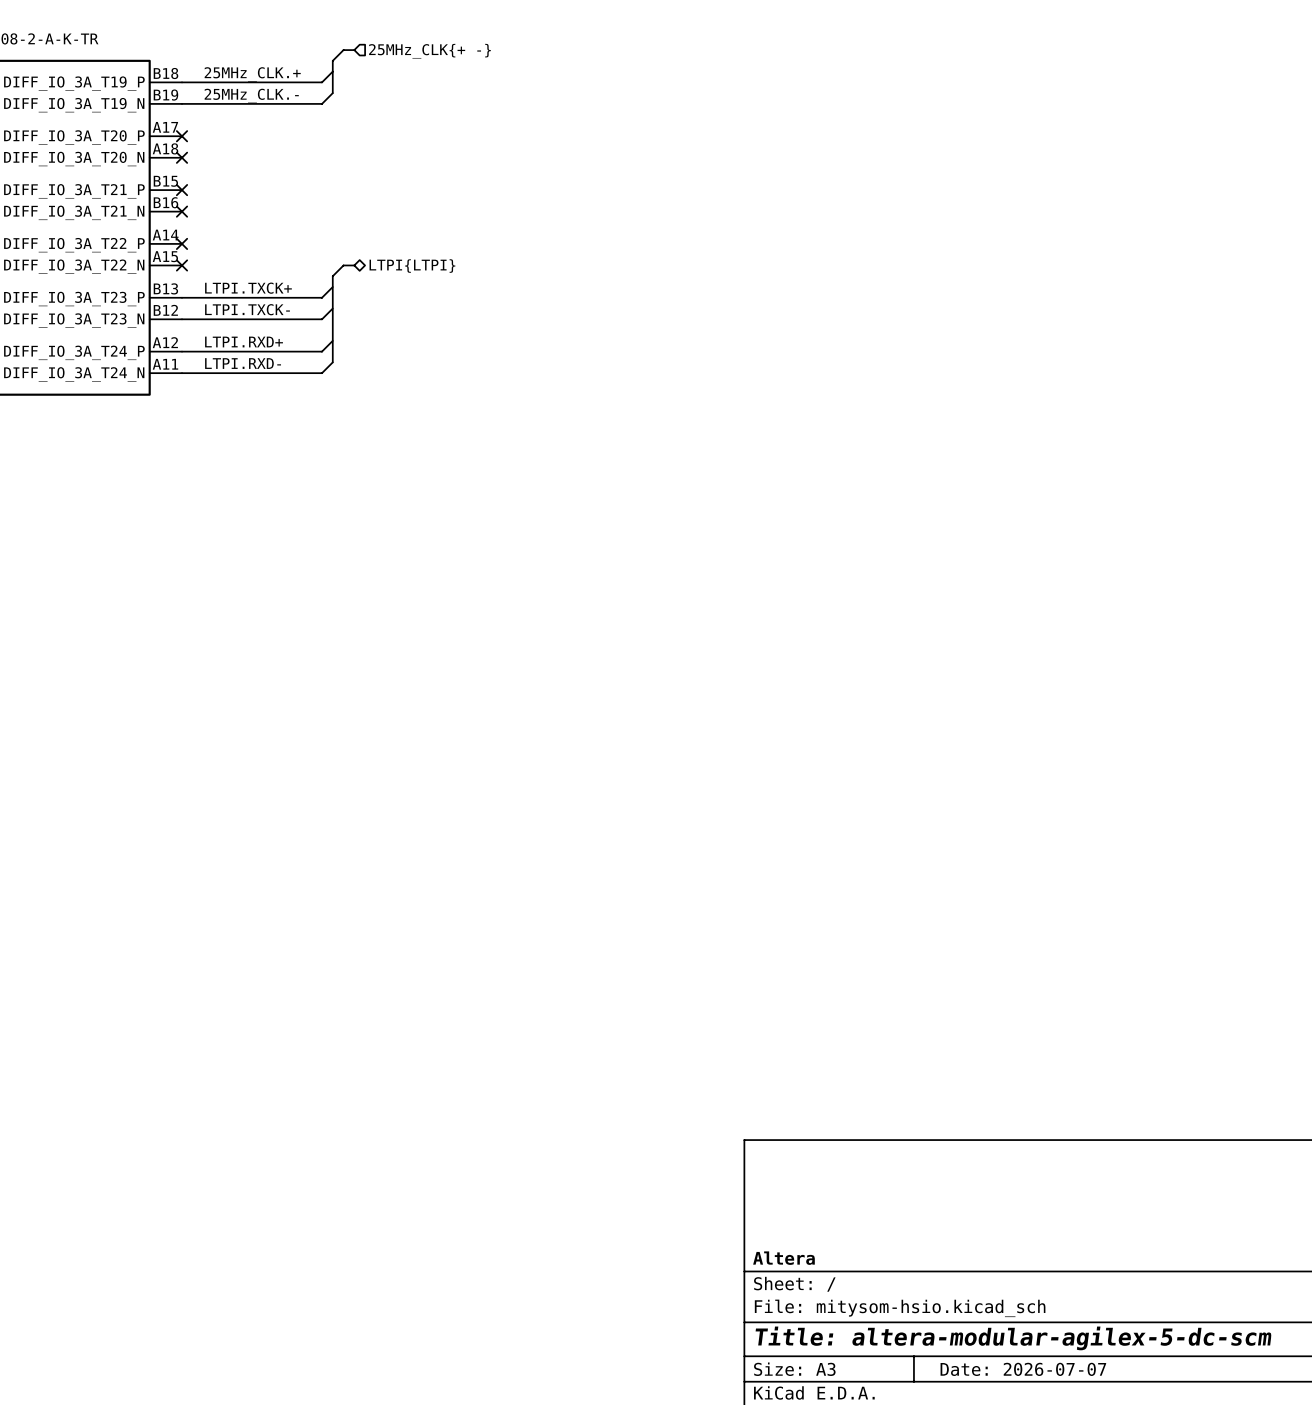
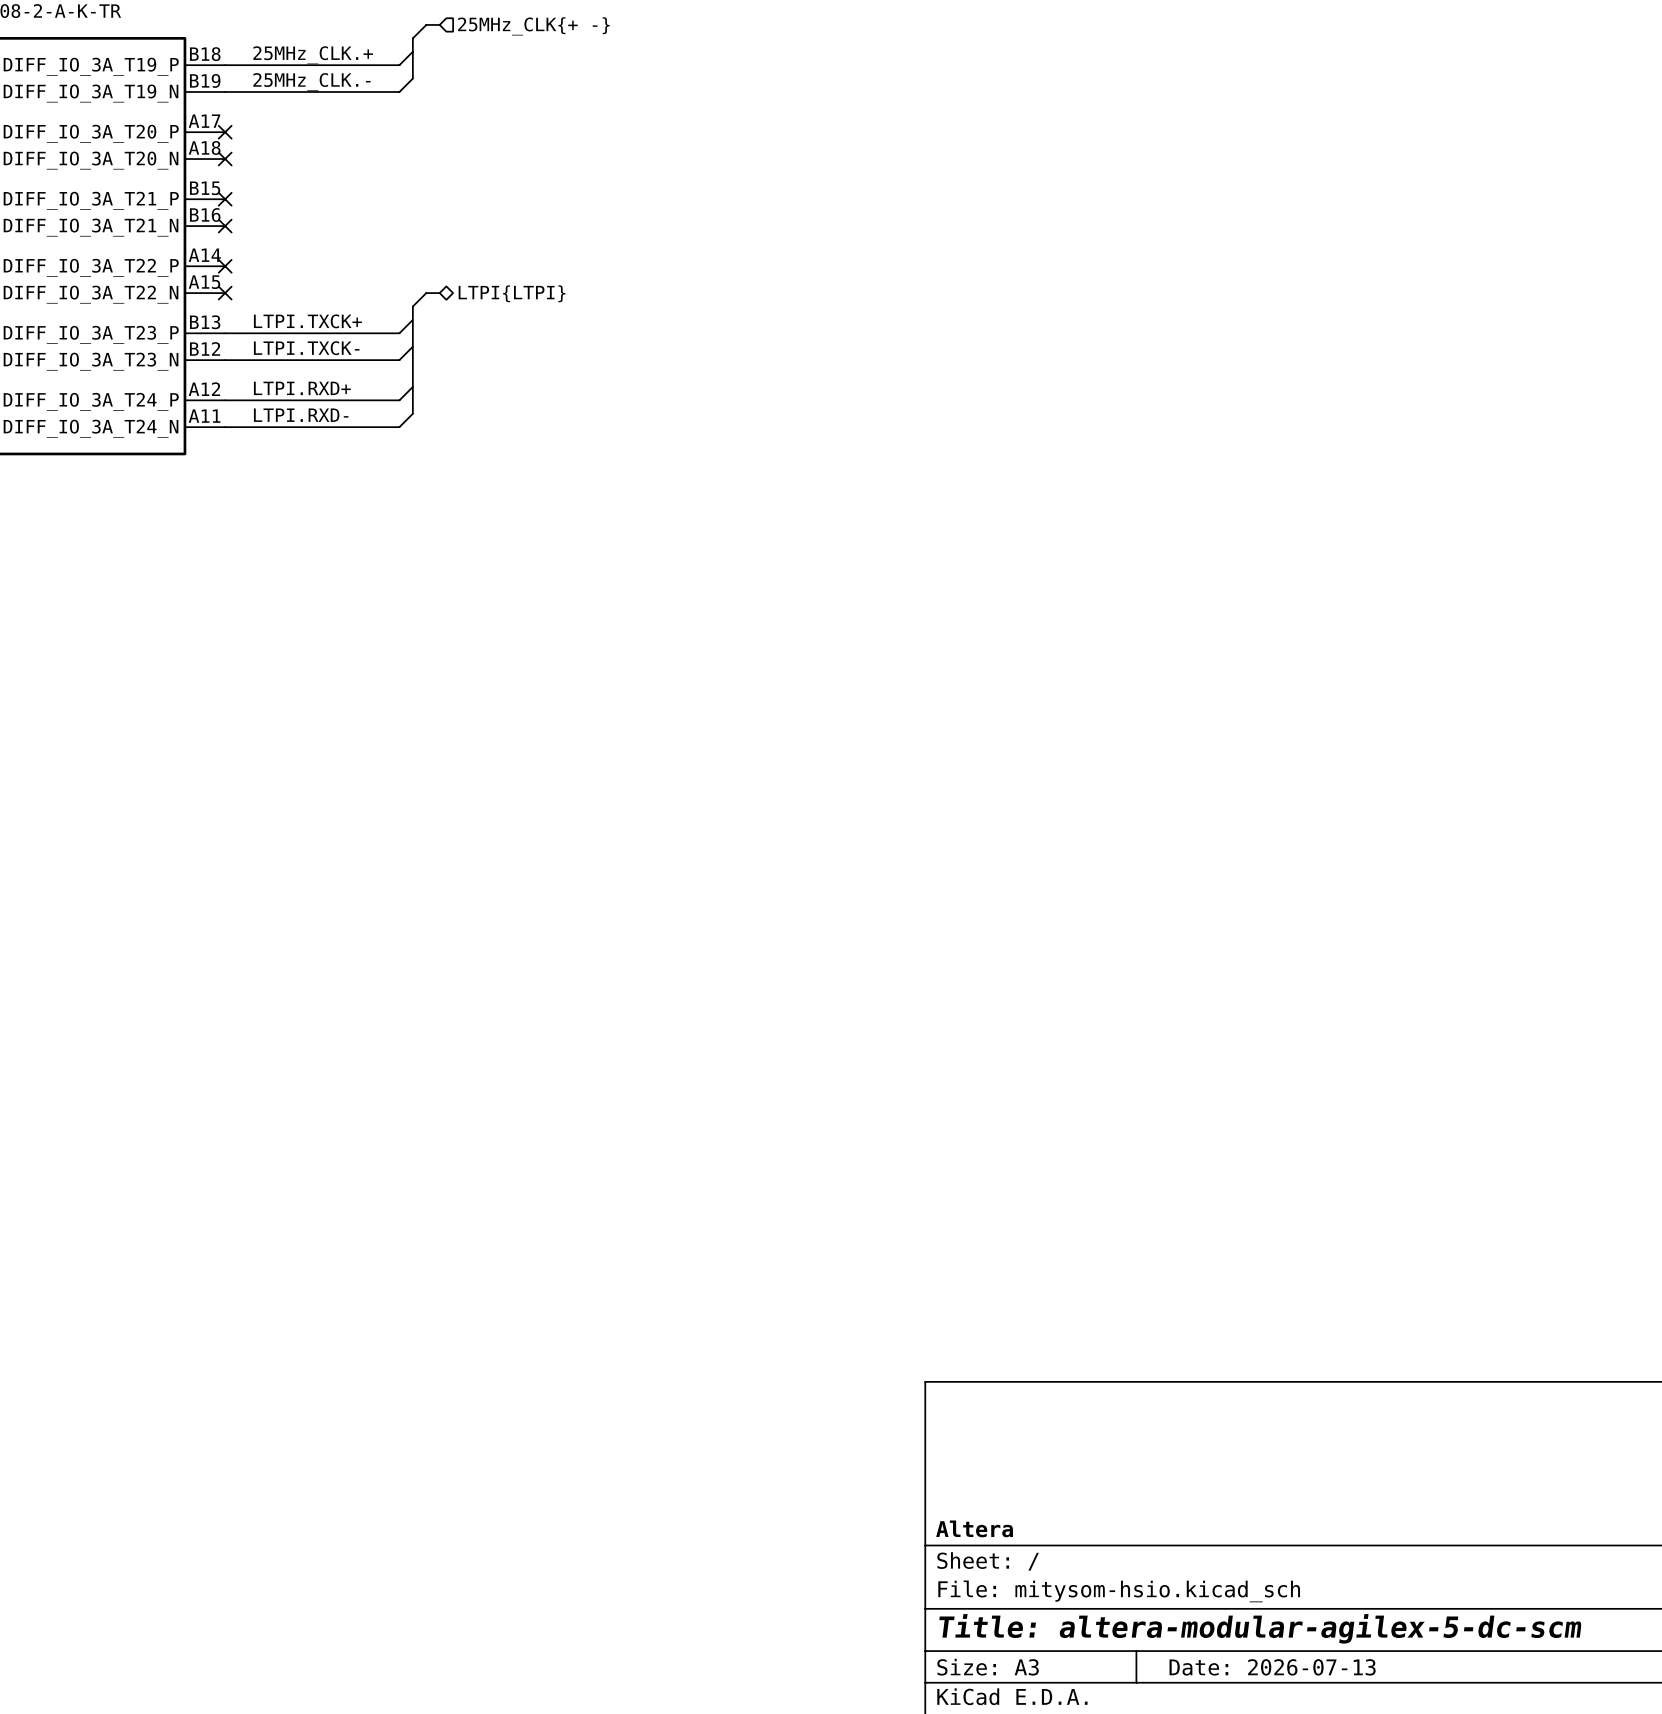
title block: Date: 2026-07-07 (1023, 1369) -> Date: 2026-07-13 (1272, 1667)

